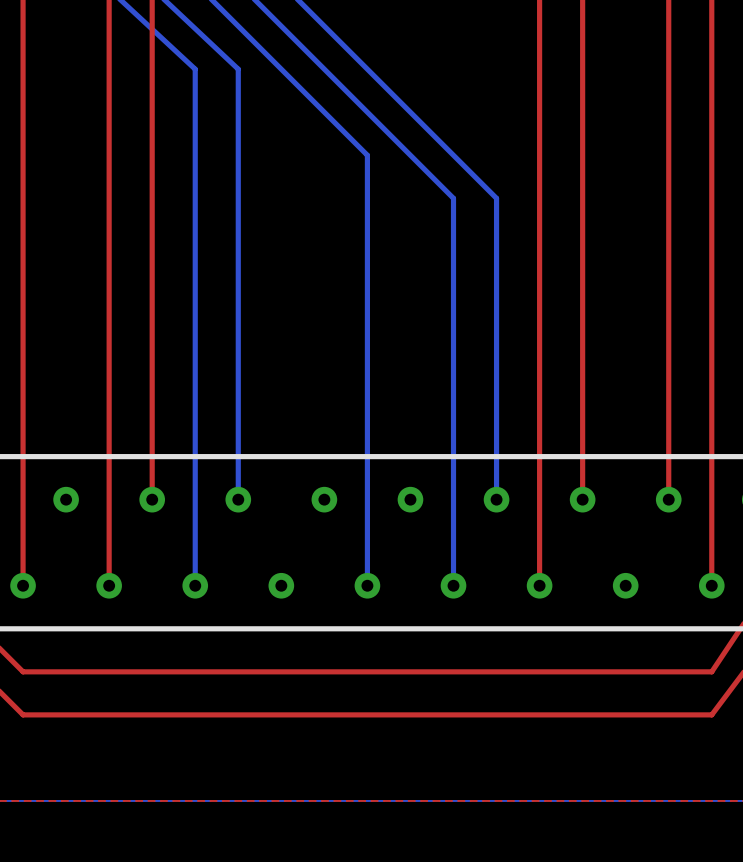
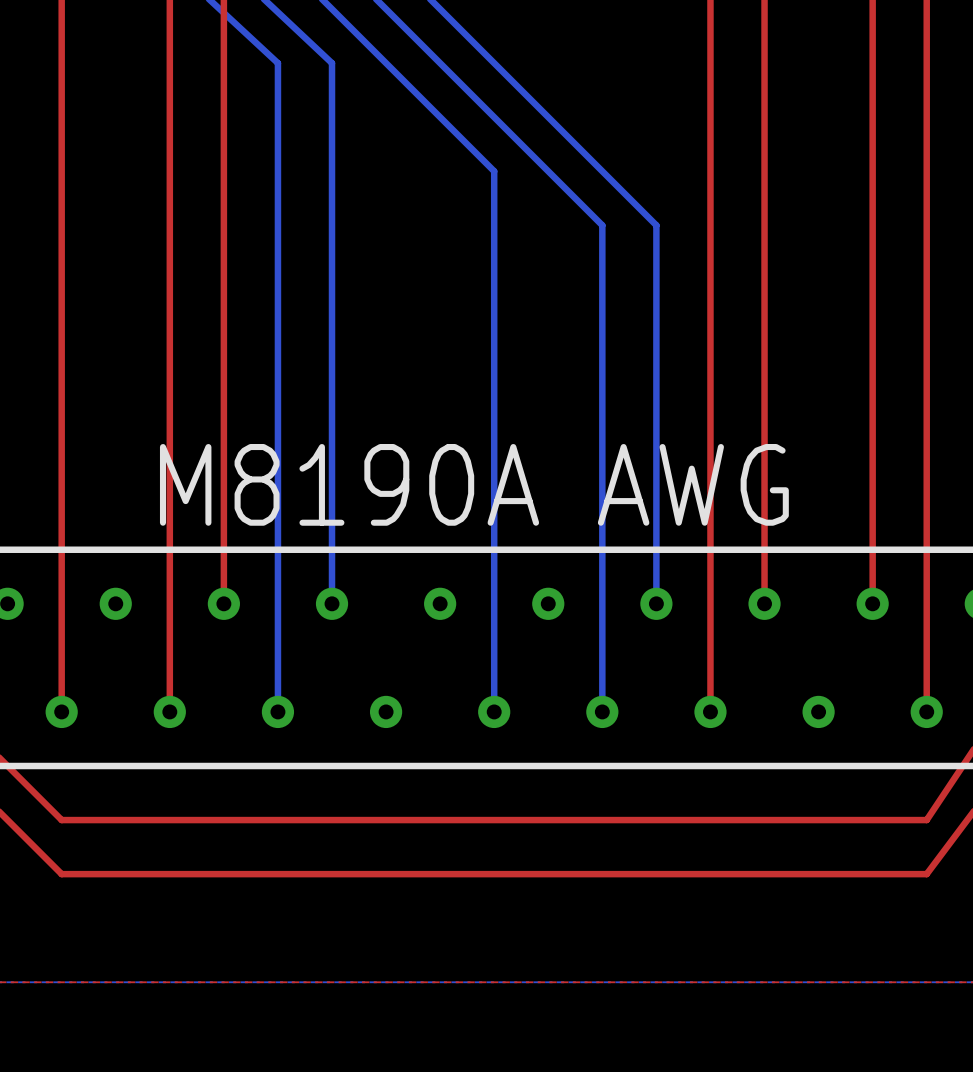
text: none -> M8190A AWG (474, 484)

